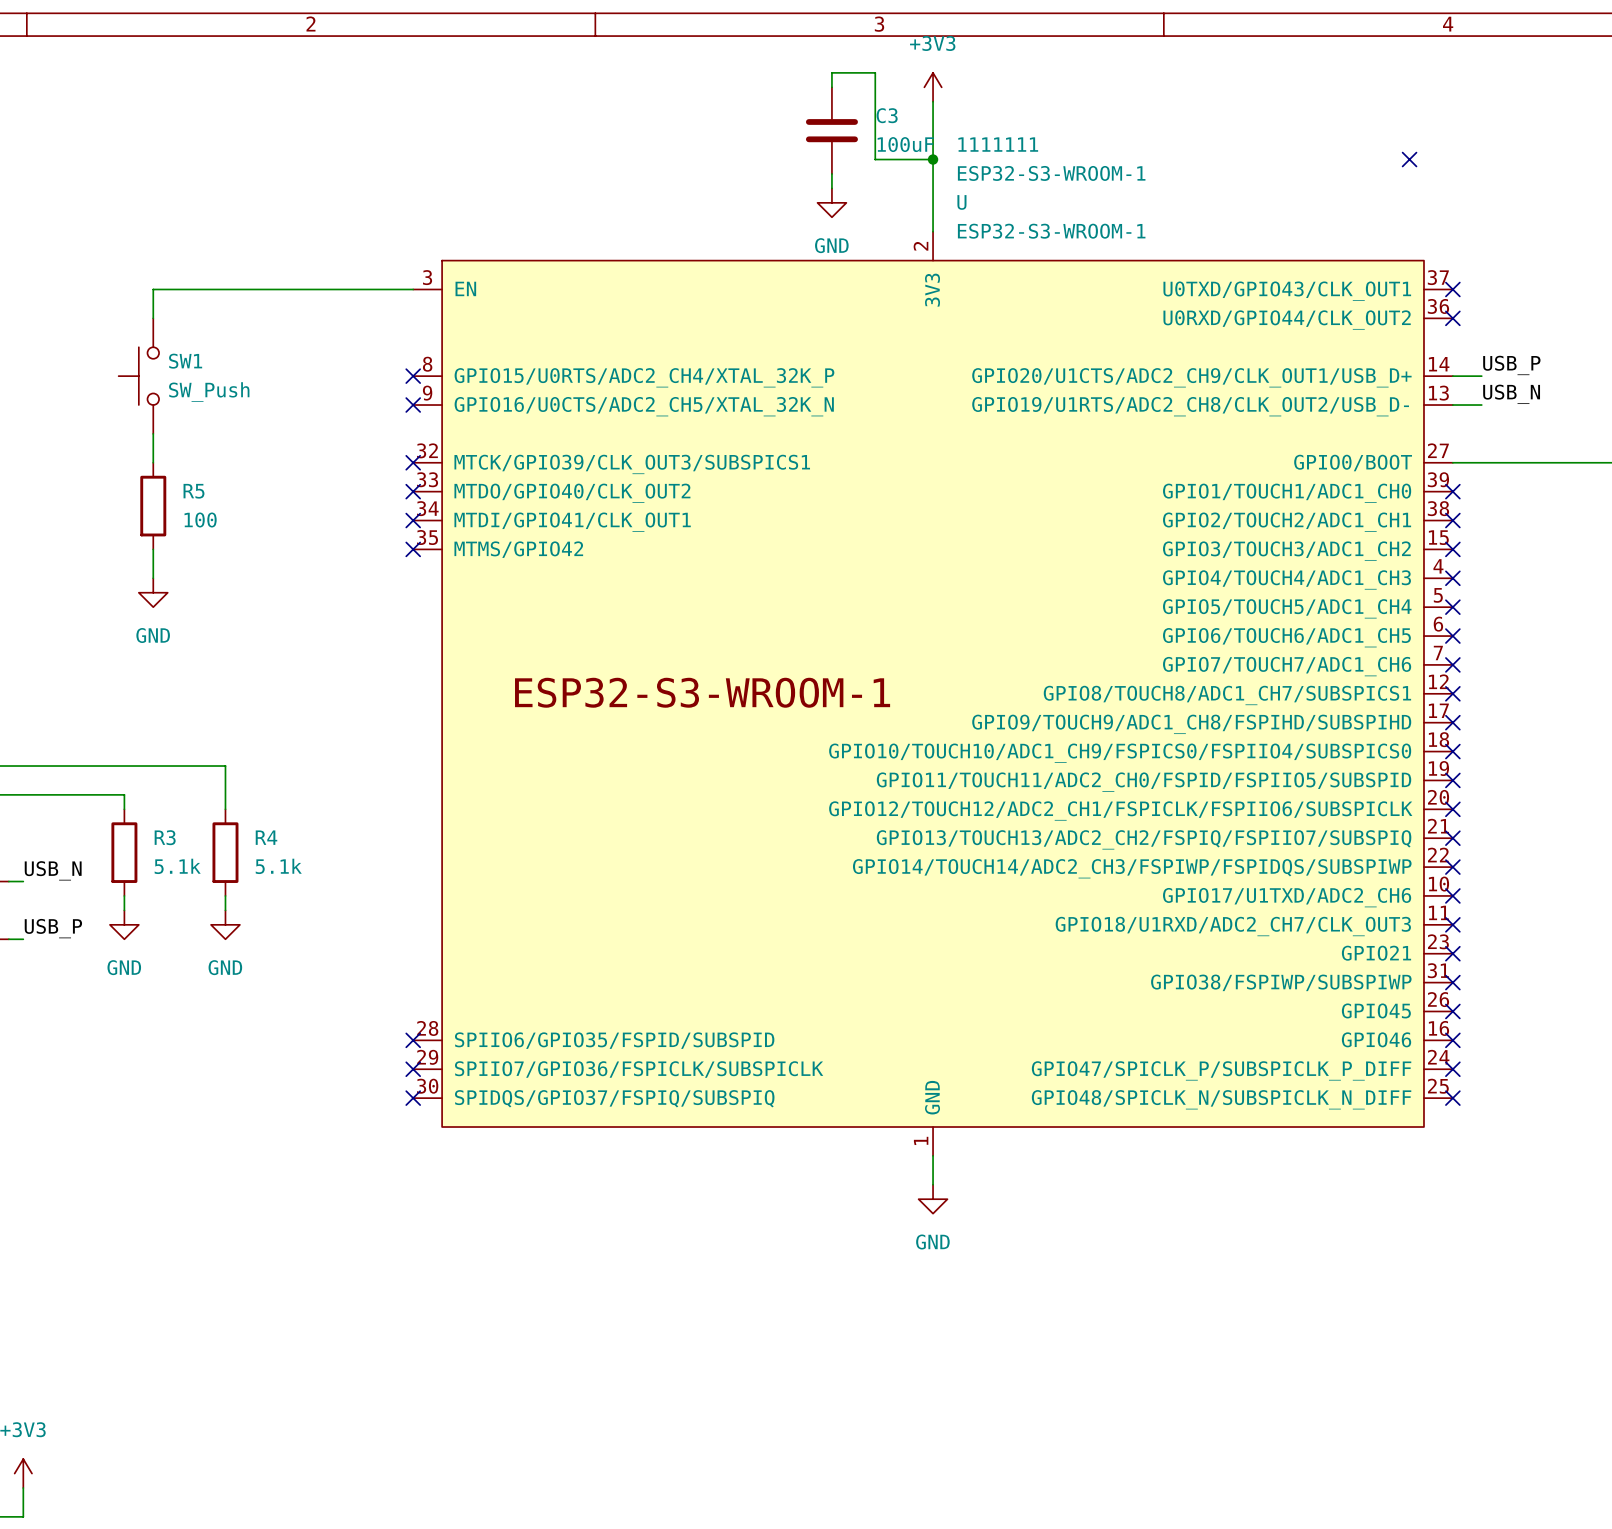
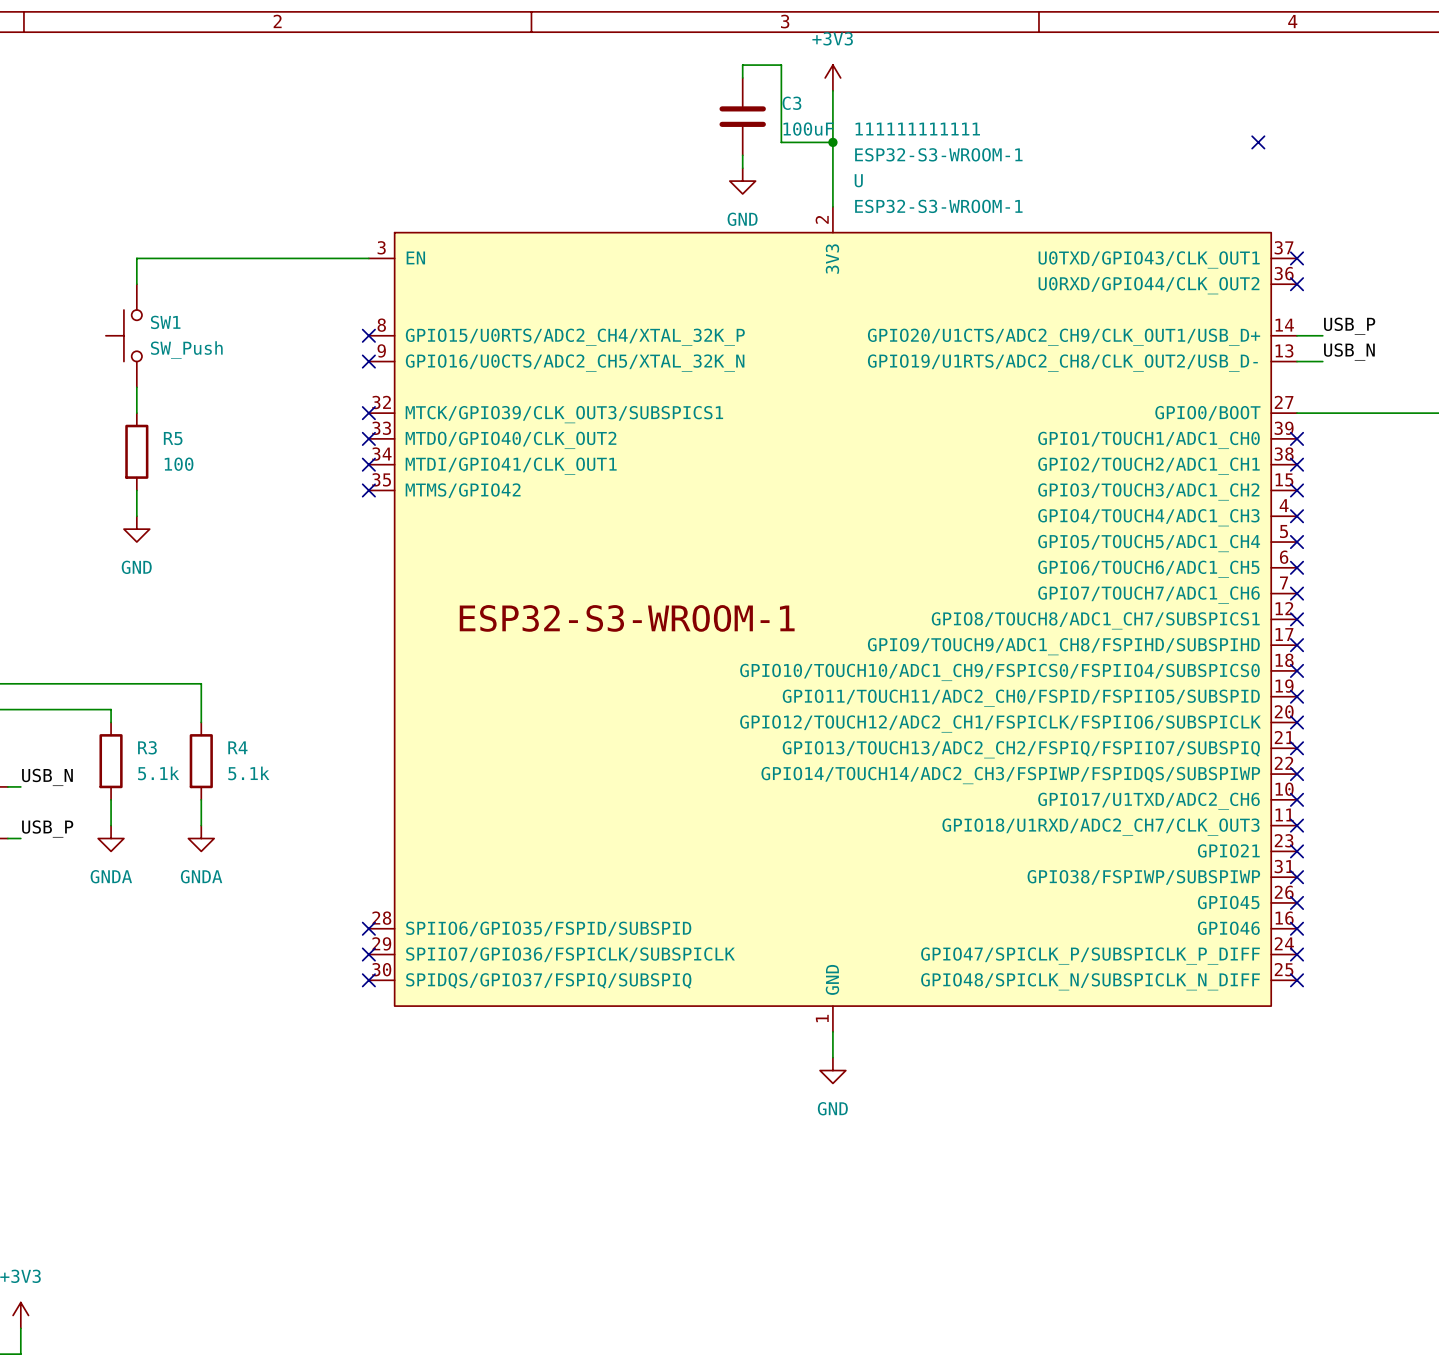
1111111 name: 1111111 (998, 144) -> 111111111111 (917, 129)
power symbol: GND (124, 924) -> none
power symbol: GND (225, 924) -> none
power symbol: none -> GNDA (111, 838)
power symbol: none -> GNDA (201, 838)

